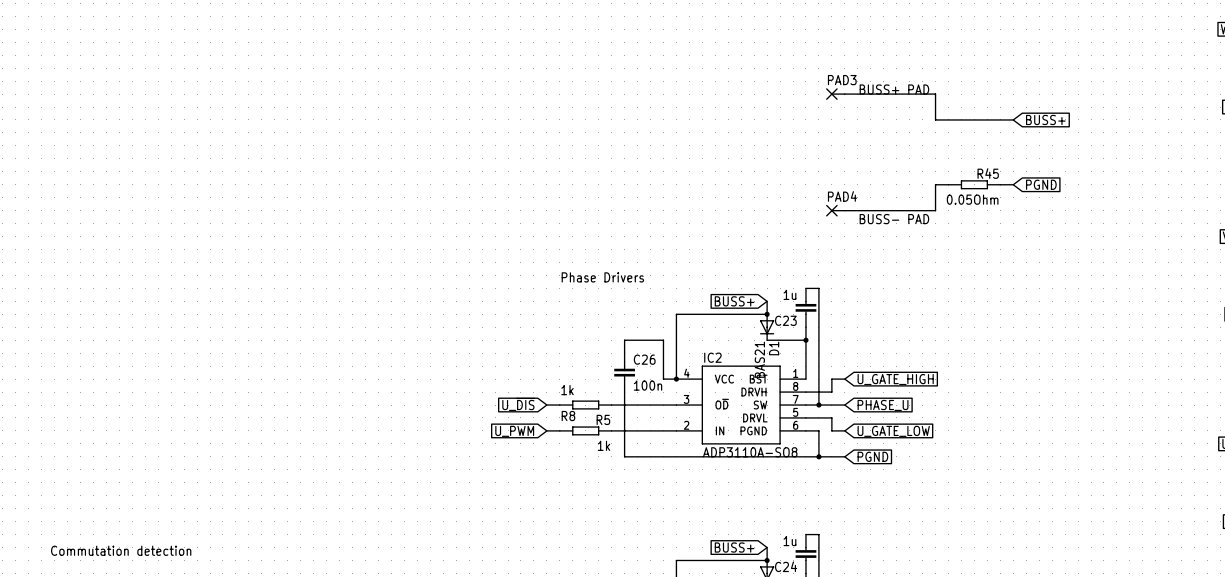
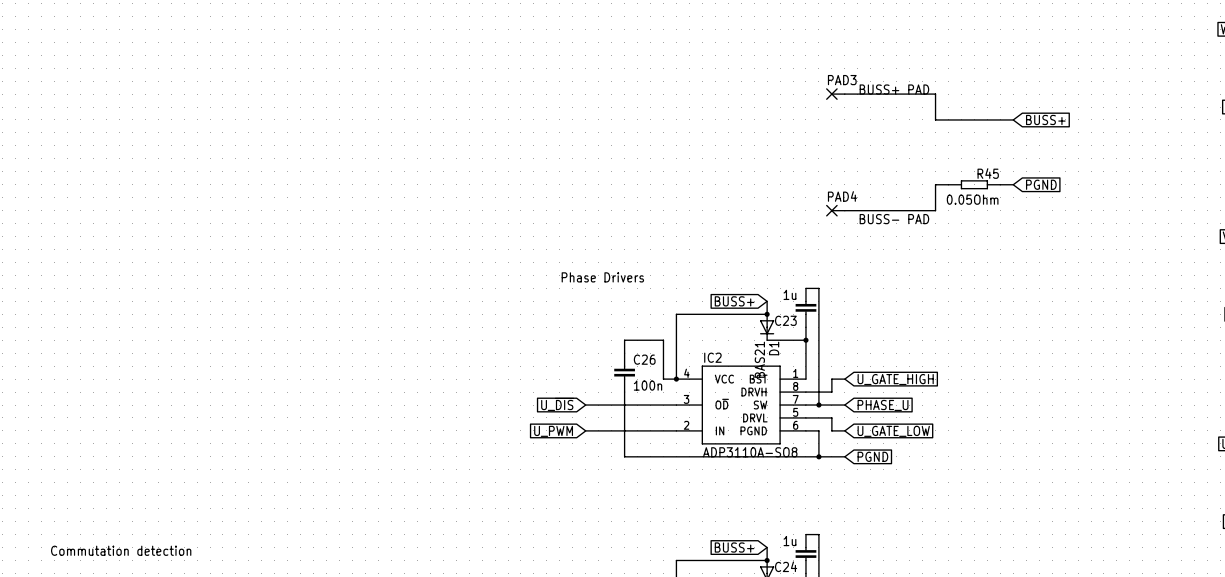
global label position: U_~{DIS} (518, 404) -> U_~{DIS} (557, 404)
wire: (546, 405) (559, 405) -> none
R8: 1k (585, 405) -> none
wire: (546, 430) (559, 430) -> none
R5: 1k (585, 430) -> none
global label position: U_PWM (514, 431) -> U_PWM (553, 431)

